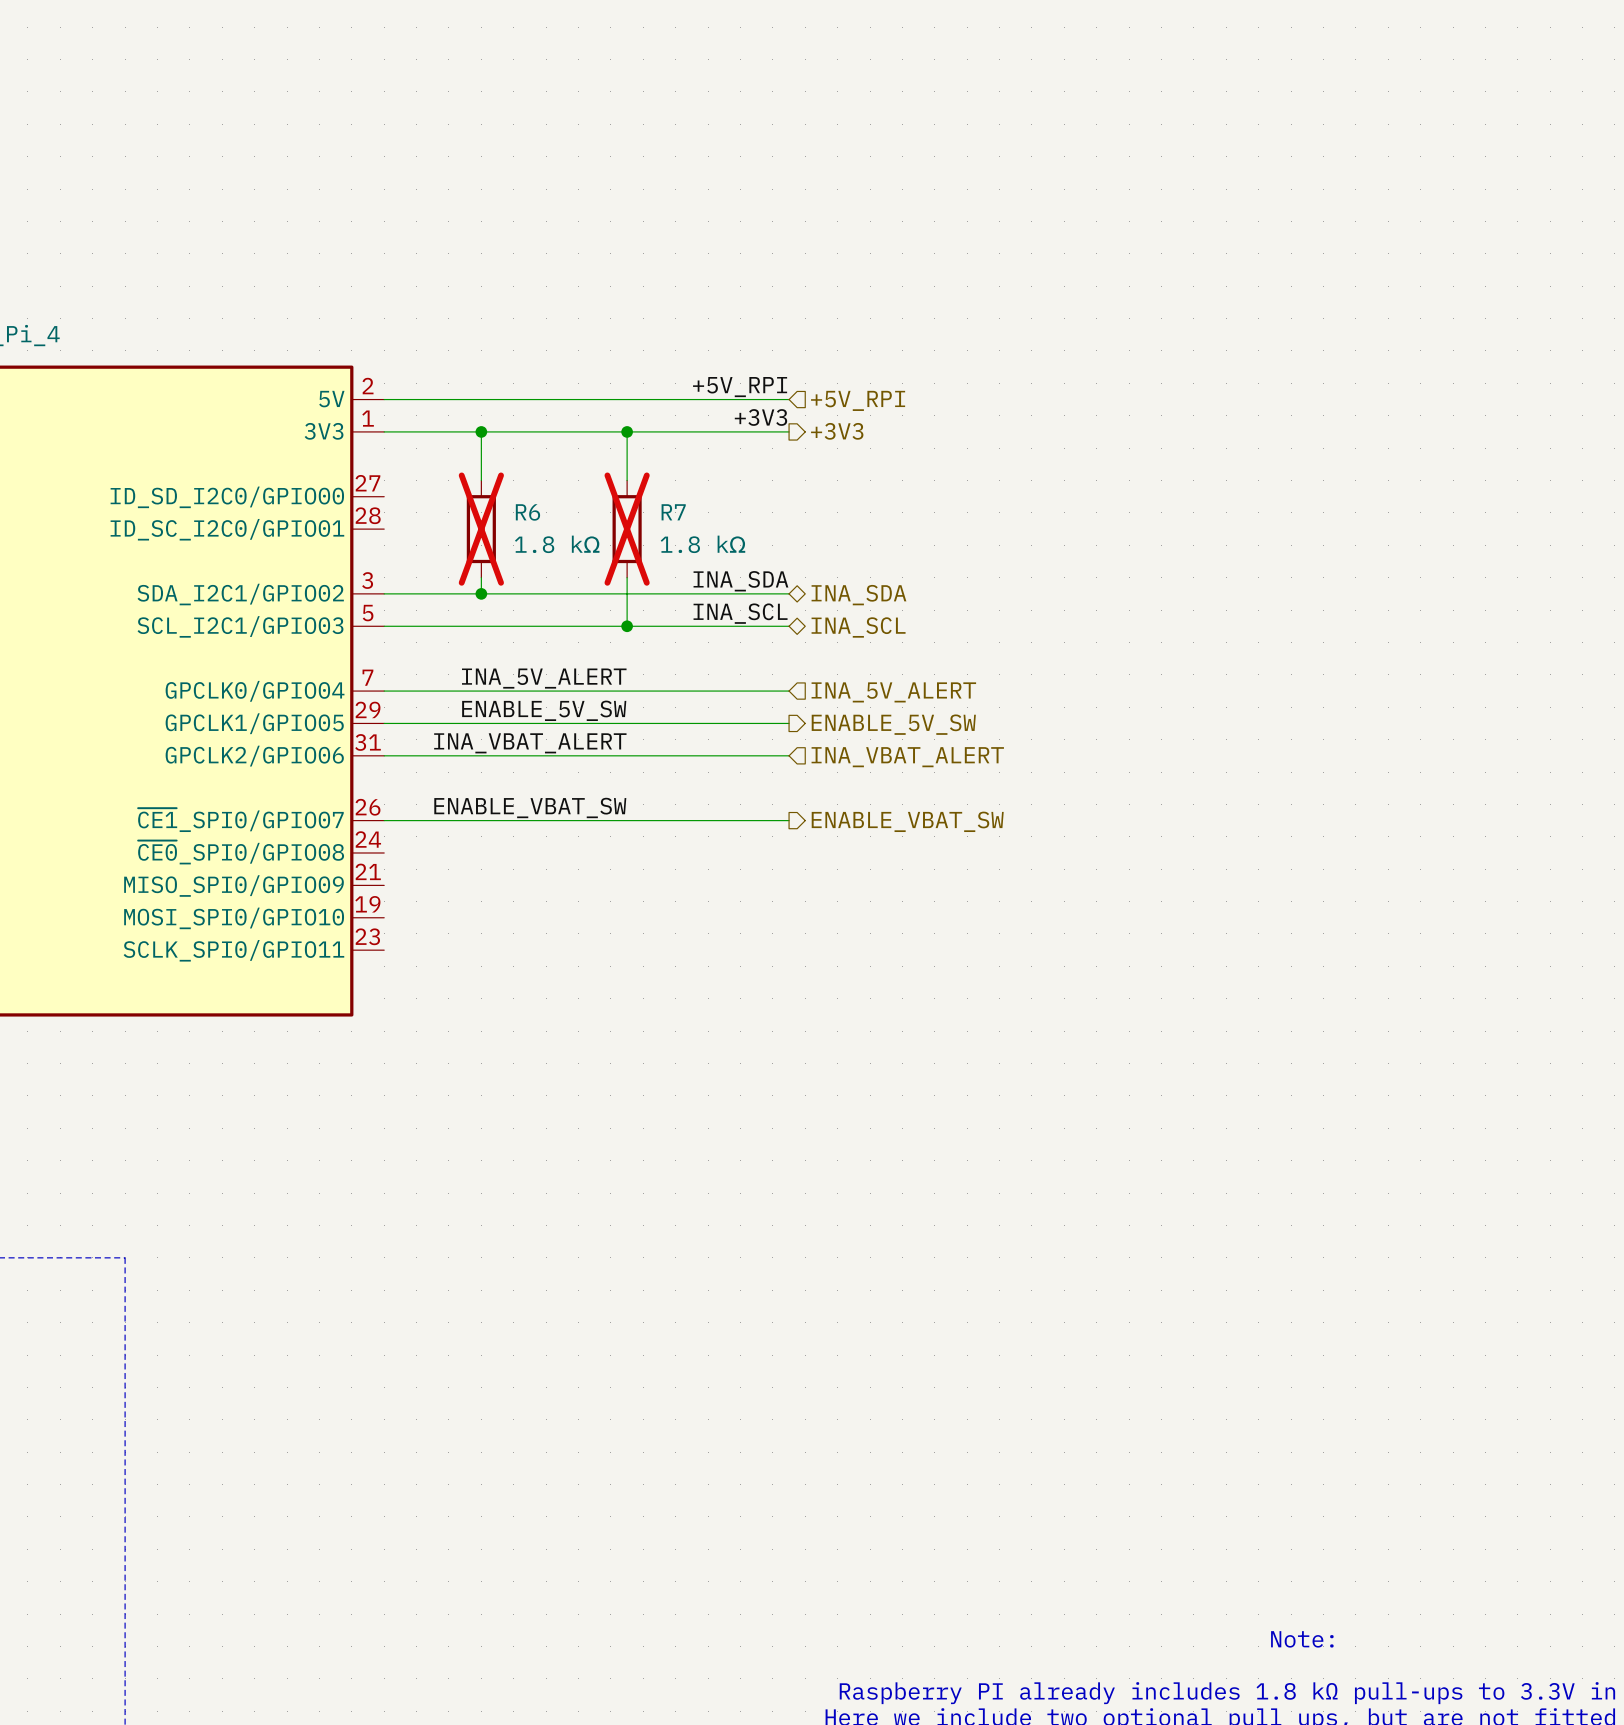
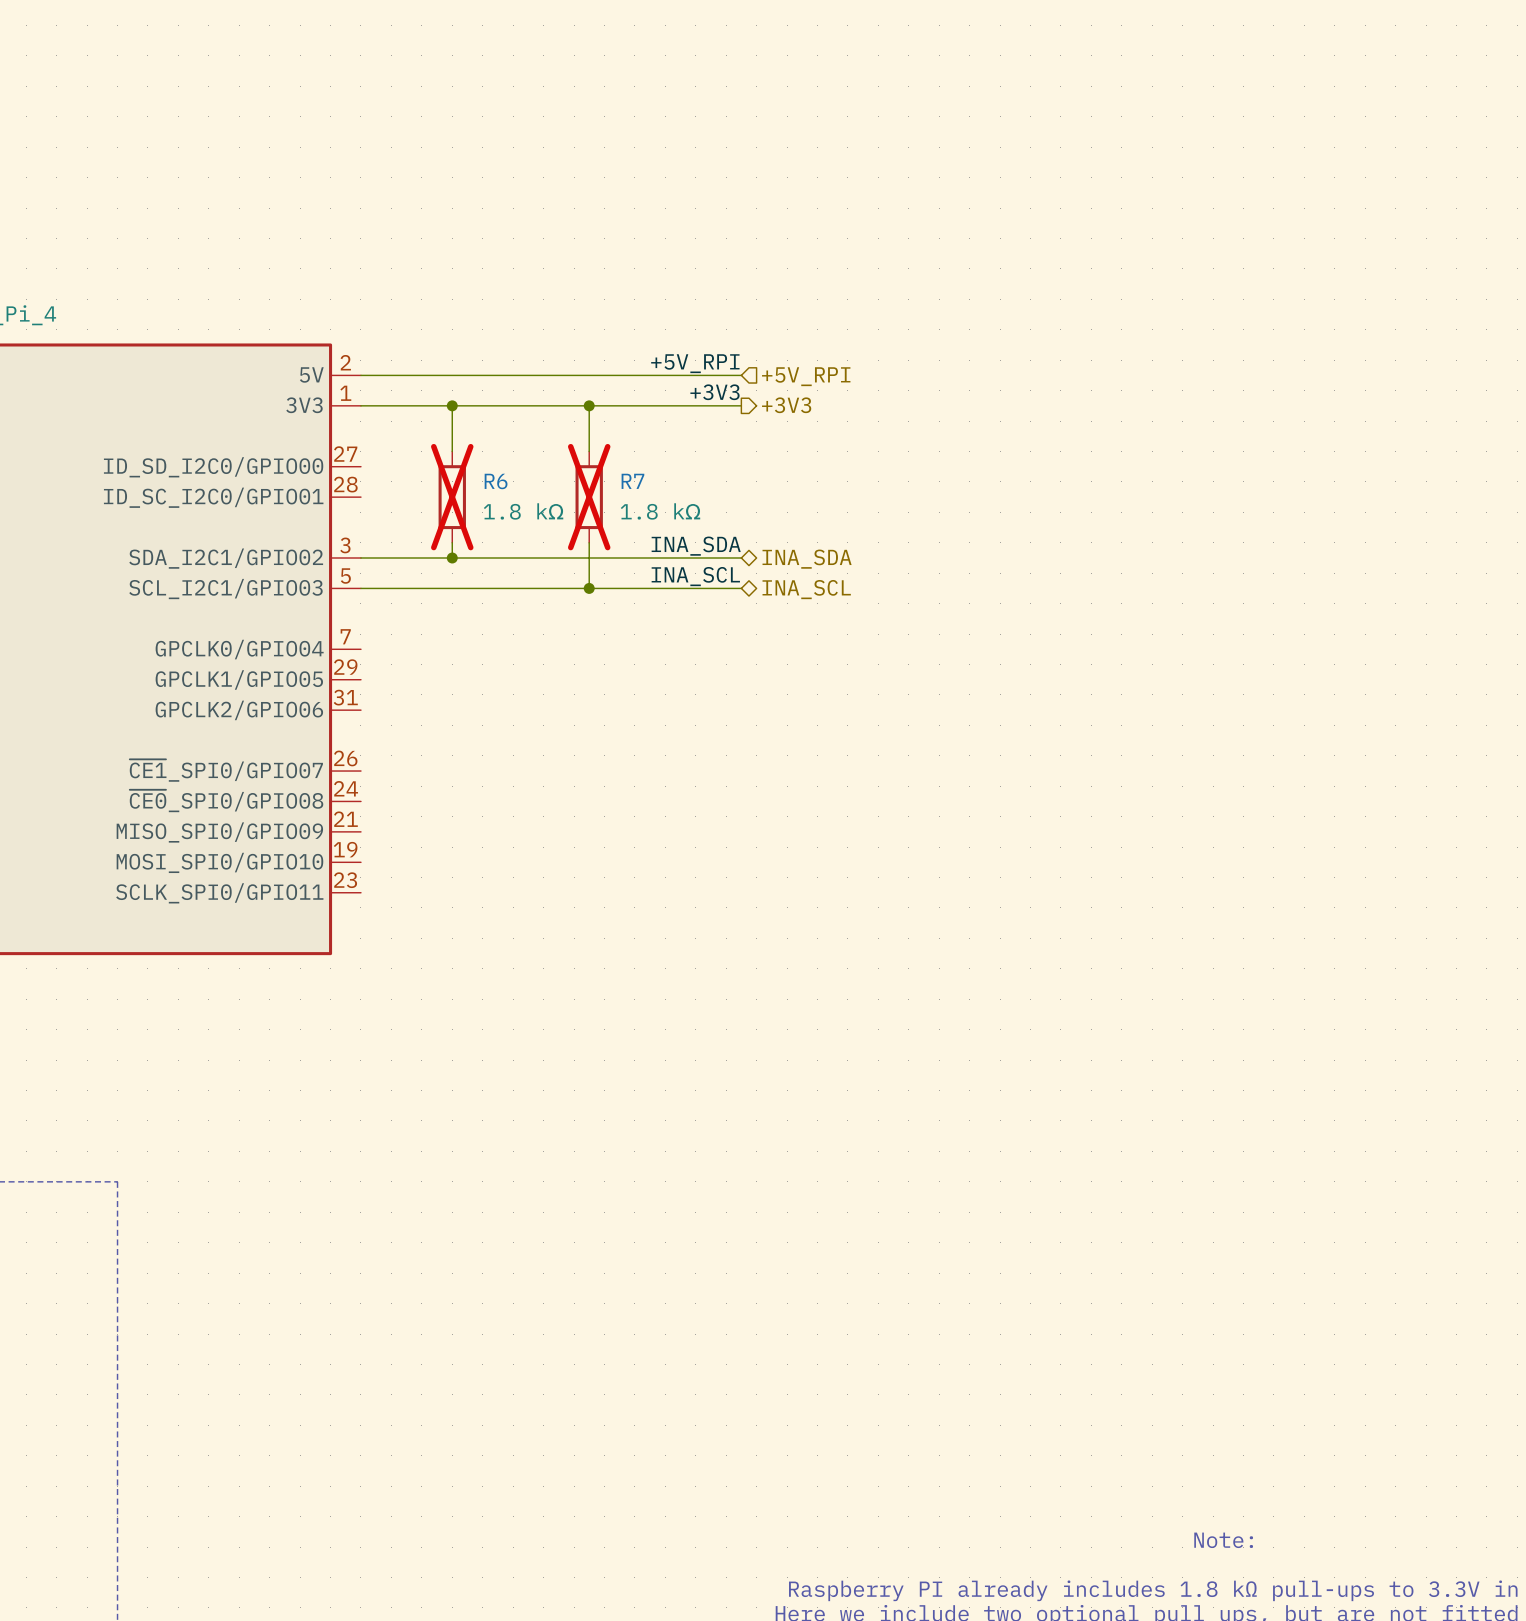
label: INA_5V_ALERT (544, 678) -> none
wire: (384, 691) (789, 691) -> none
hierarchical label: INA_5V_ALERT (893, 692) -> none
label: ENABLE_5V_SW (544, 710) -> none
wire: (384, 723) (789, 723) -> none
hierarchical label: ENABLE_5V_SW (893, 724) -> none
label: INA_VBAT_ALERT (530, 743) -> none
wire: (384, 755) (789, 755) -> none
hierarchical label: INA_VBAT_ALERT (907, 757) -> none
label: ENABLE_VBAT_SW (530, 807) -> none
wire: (384, 820) (789, 820) -> none
hierarchical label: ENABLE_VBAT_SW (907, 821) -> none

